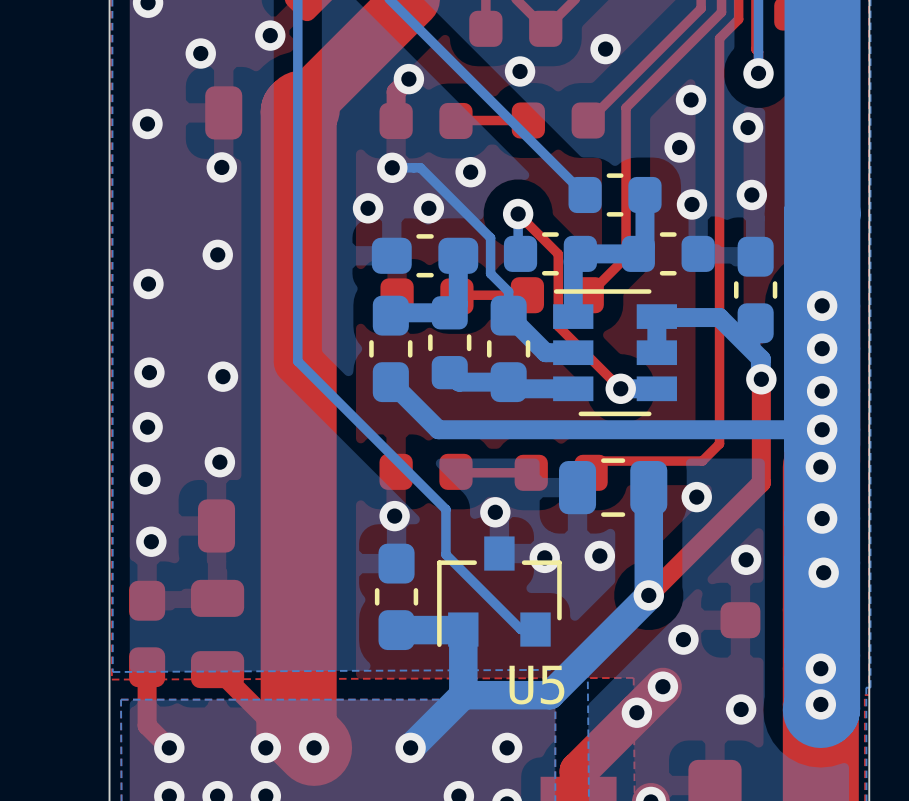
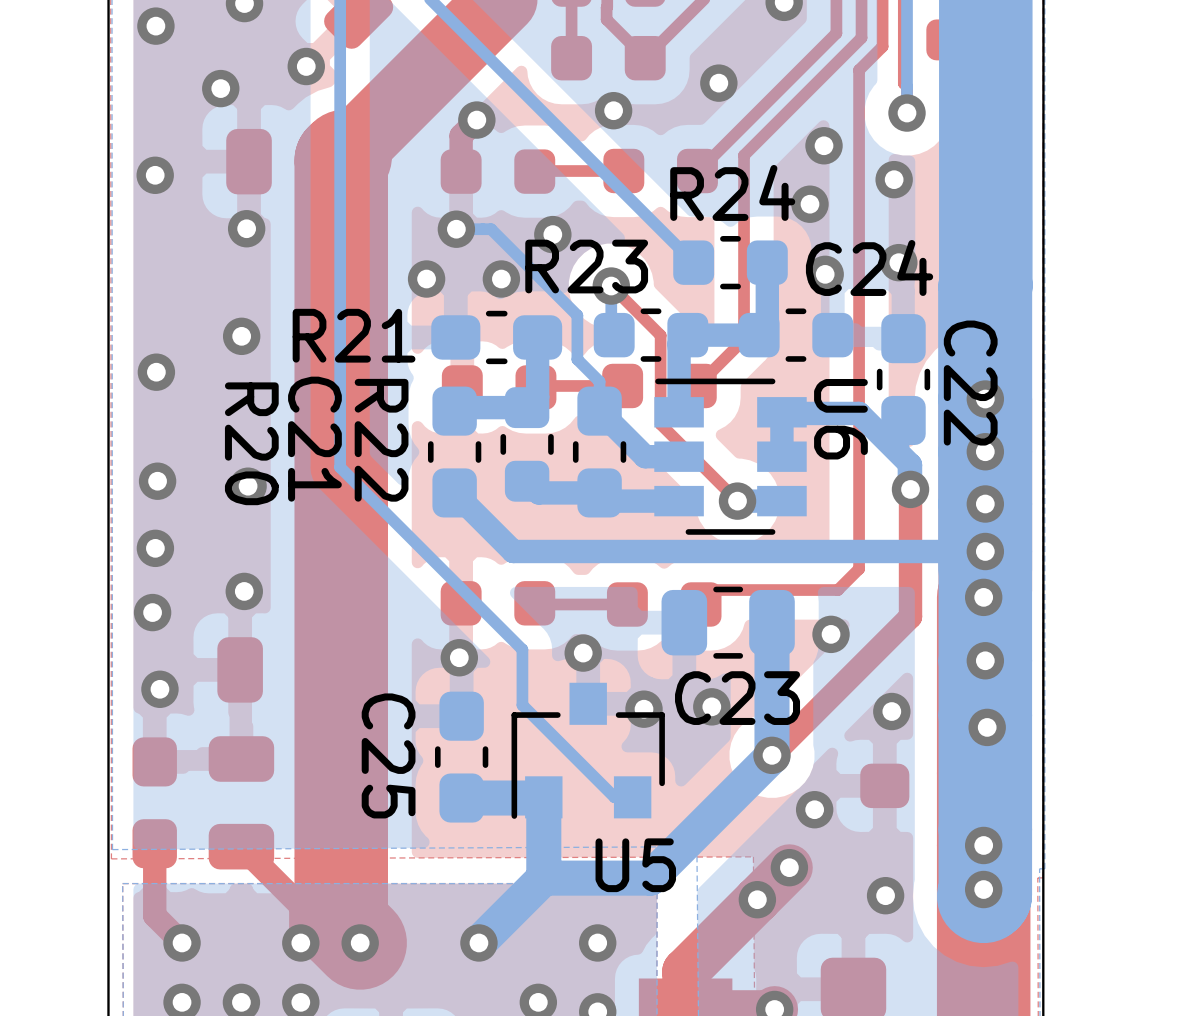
R24 name: none -> R24 (732, 192)
R23 name: none -> R23 (586, 266)
C24 name: none -> C24 (869, 267)
R21 name: none -> R21 (354, 335)
C22 name: none -> C22 (970, 383)
U6 name: none -> U6 (840, 419)
C21 name: none -> C21 (314, 439)
R22 name: none -> R22 (381, 440)
R20 name: none -> R20 (251, 443)
C23 name: none -> C23 (737, 698)
C25 name: none -> C25 (388, 755)

